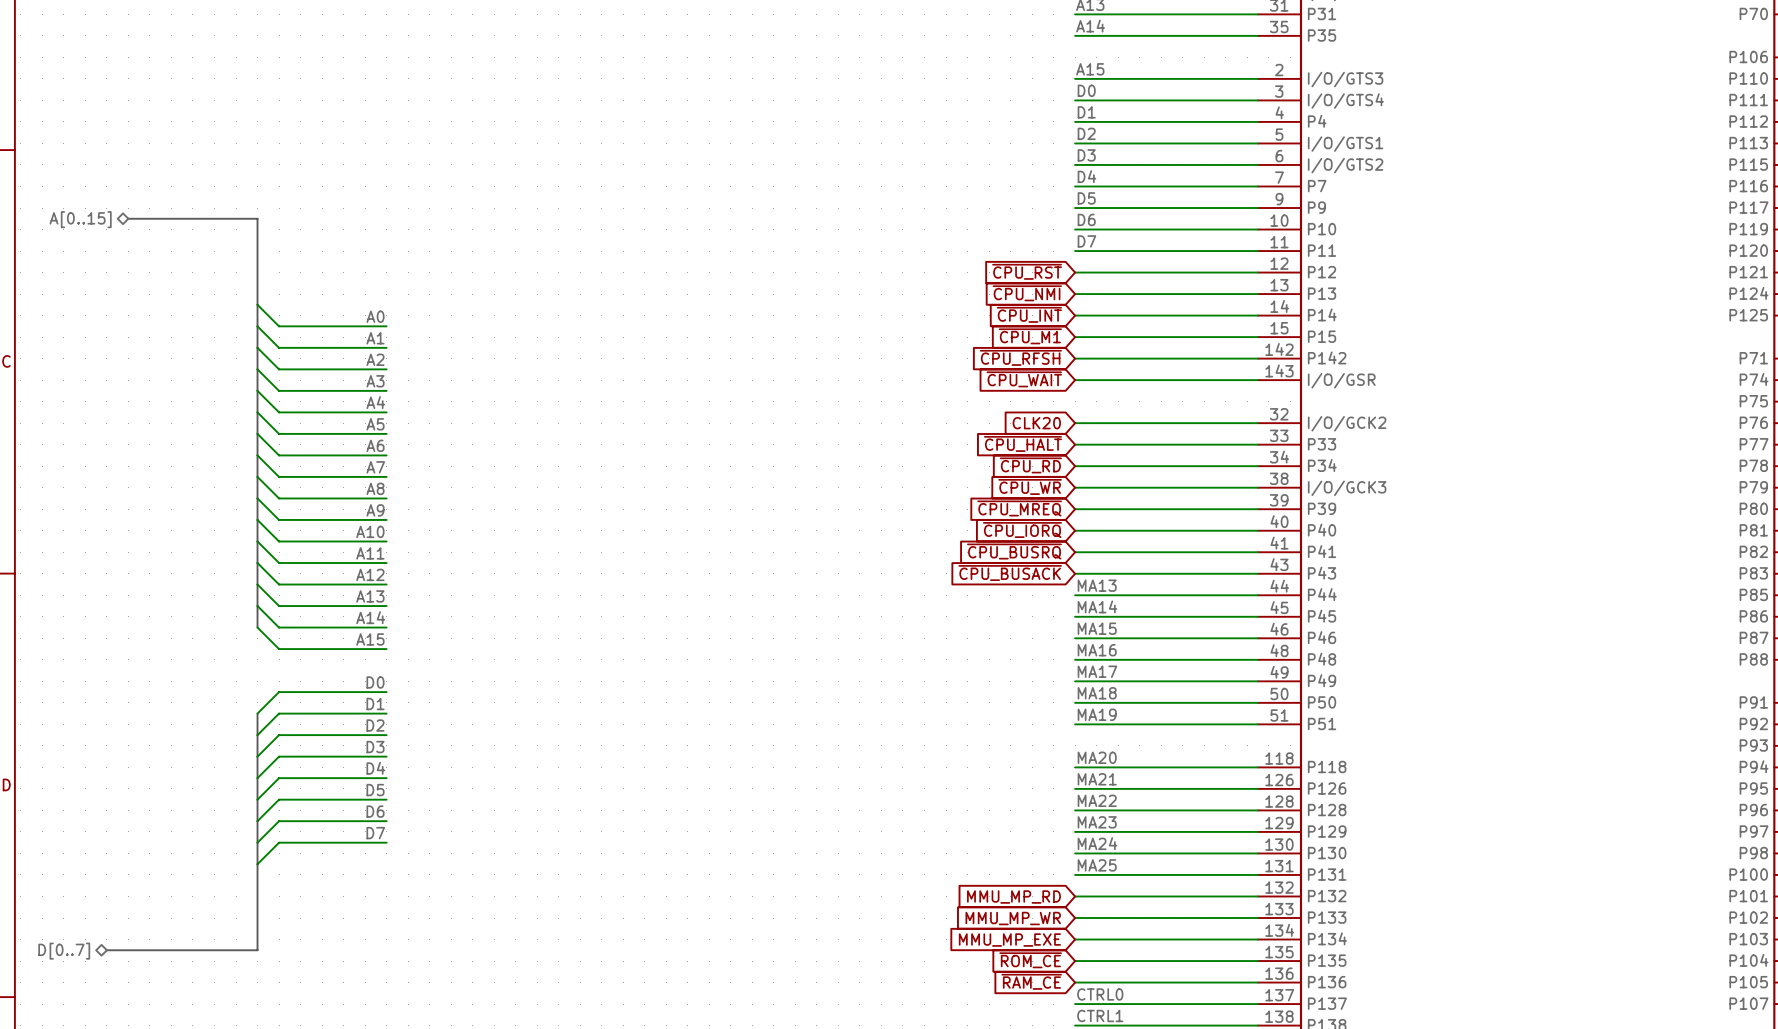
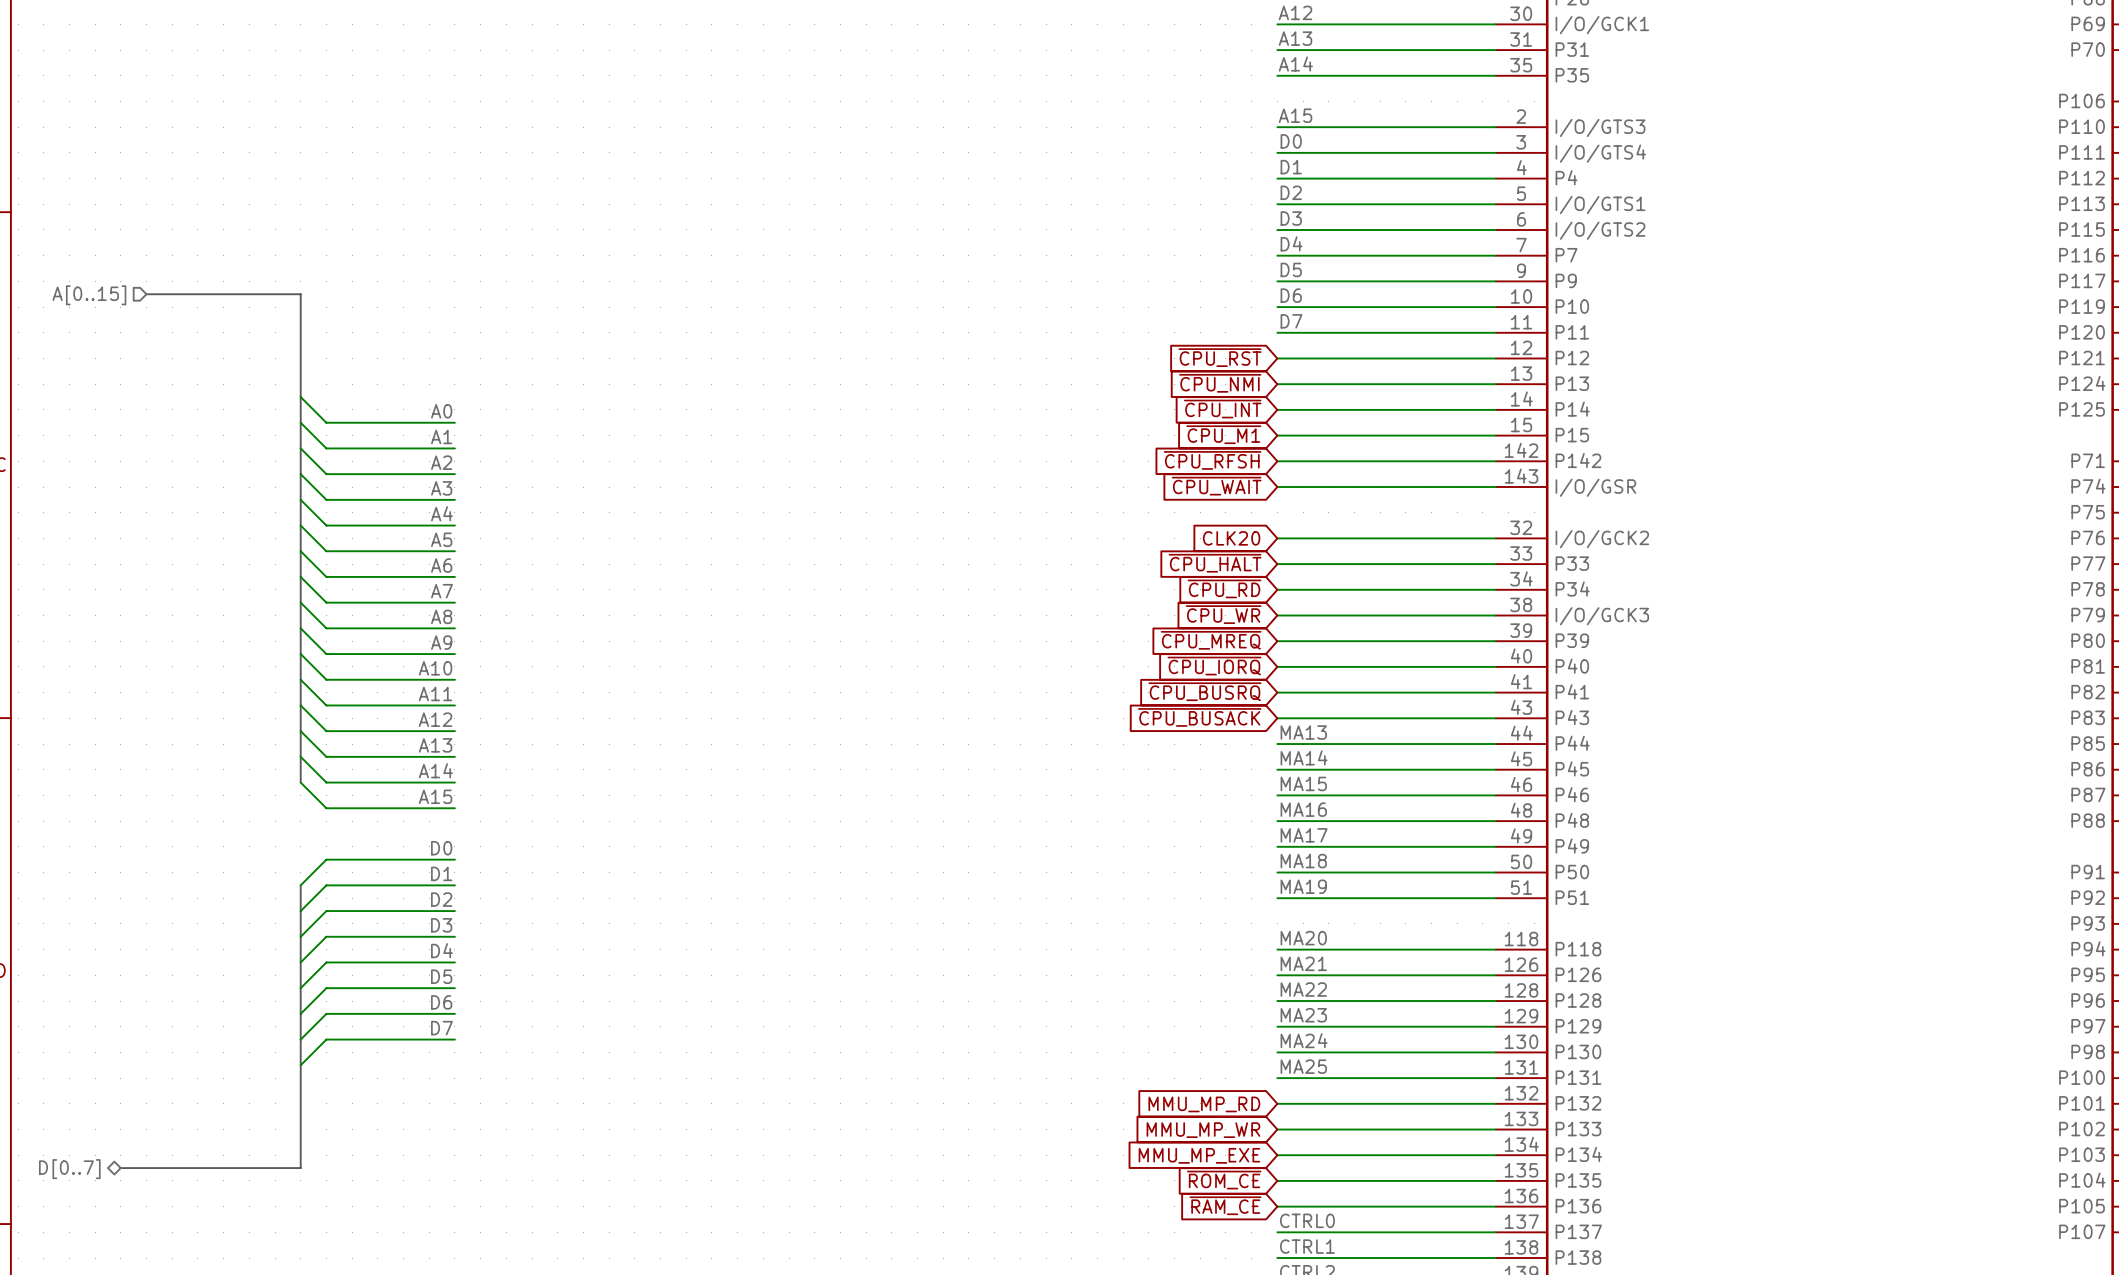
hierarchical label shape: bidirectional (80, 219) -> input (89, 295)

